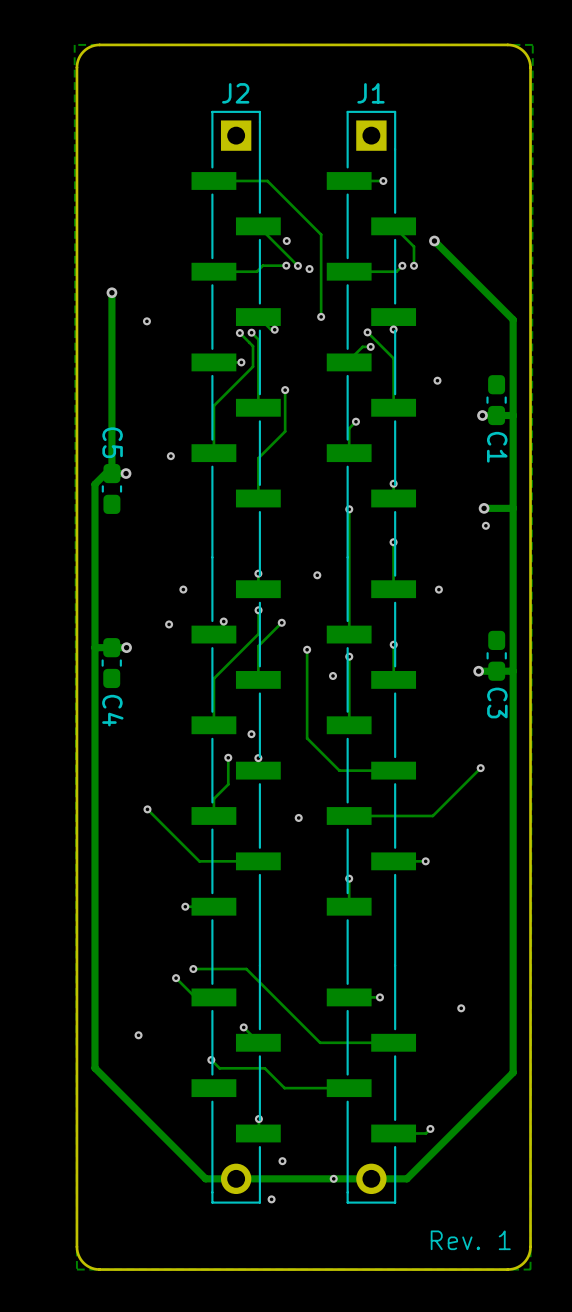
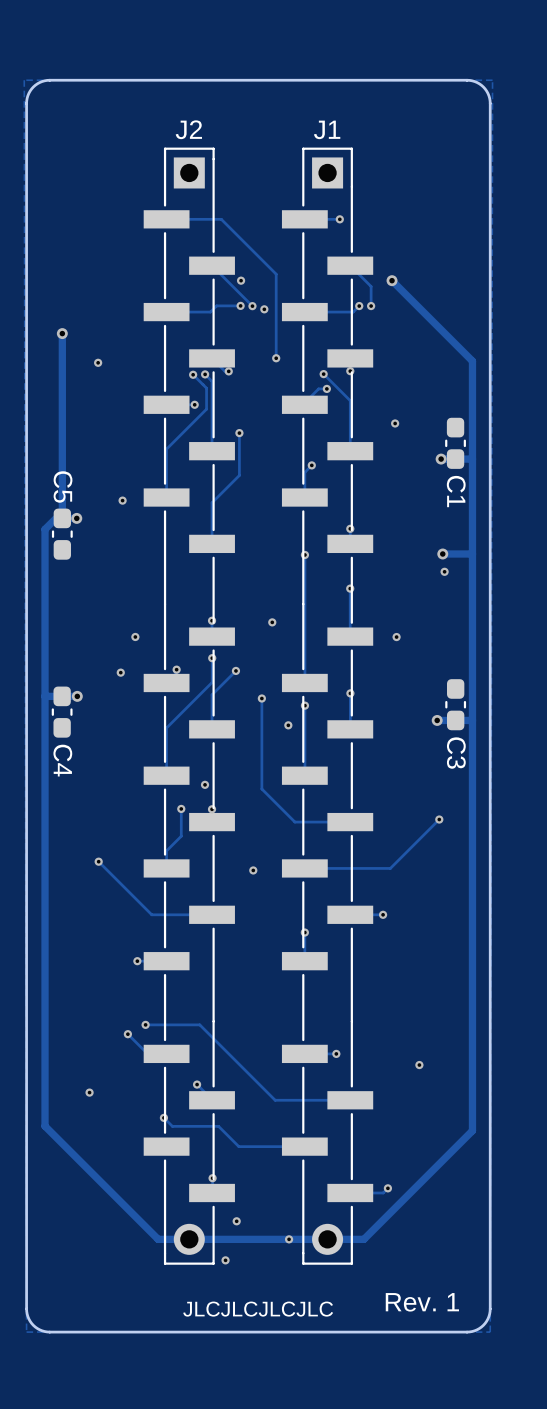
text: none -> JLCJLCJLCJLC (258, 1309)

